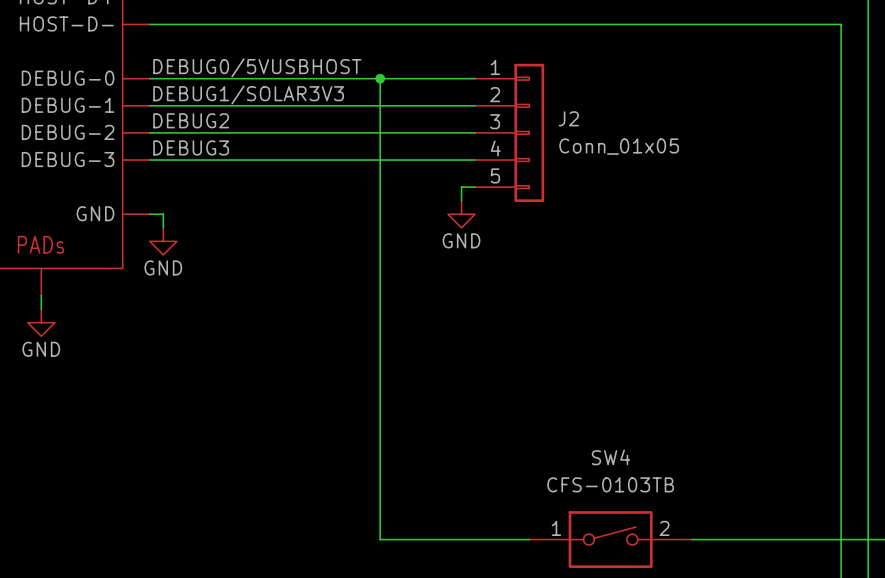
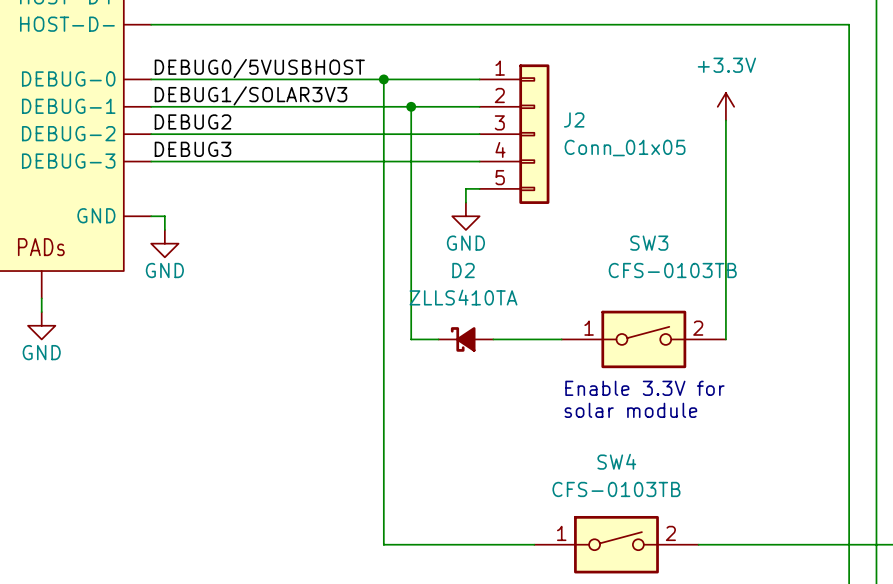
wire: none -> (411, 106) (411, 339) (438, 339)
junction: none -> (411, 106)
power symbol: none -> +3.3V (725, 106)
wire: none -> (725, 120) (725, 339)
D2: none -> ZLLS410TA (465, 339)
wire: none -> (493, 339) (561, 339)
SW3: none -> CFS-0103TB (643, 339)
text: none -> Enable 3.3V for (644, 388)
text: none -> solar module (630, 410)

